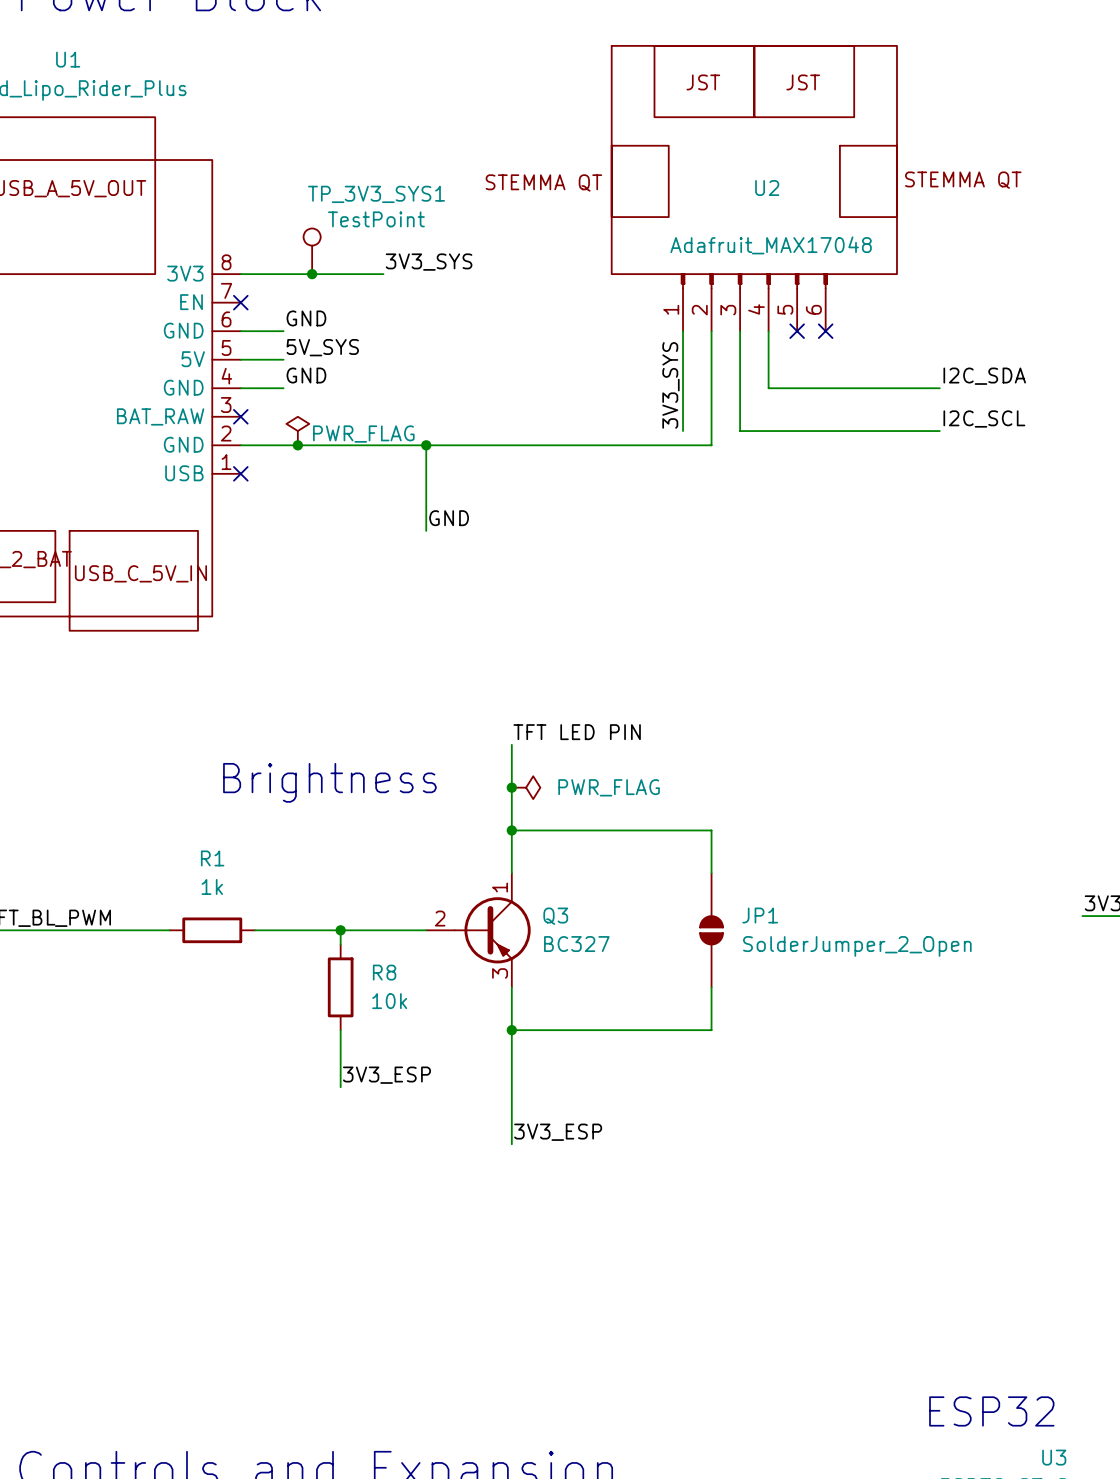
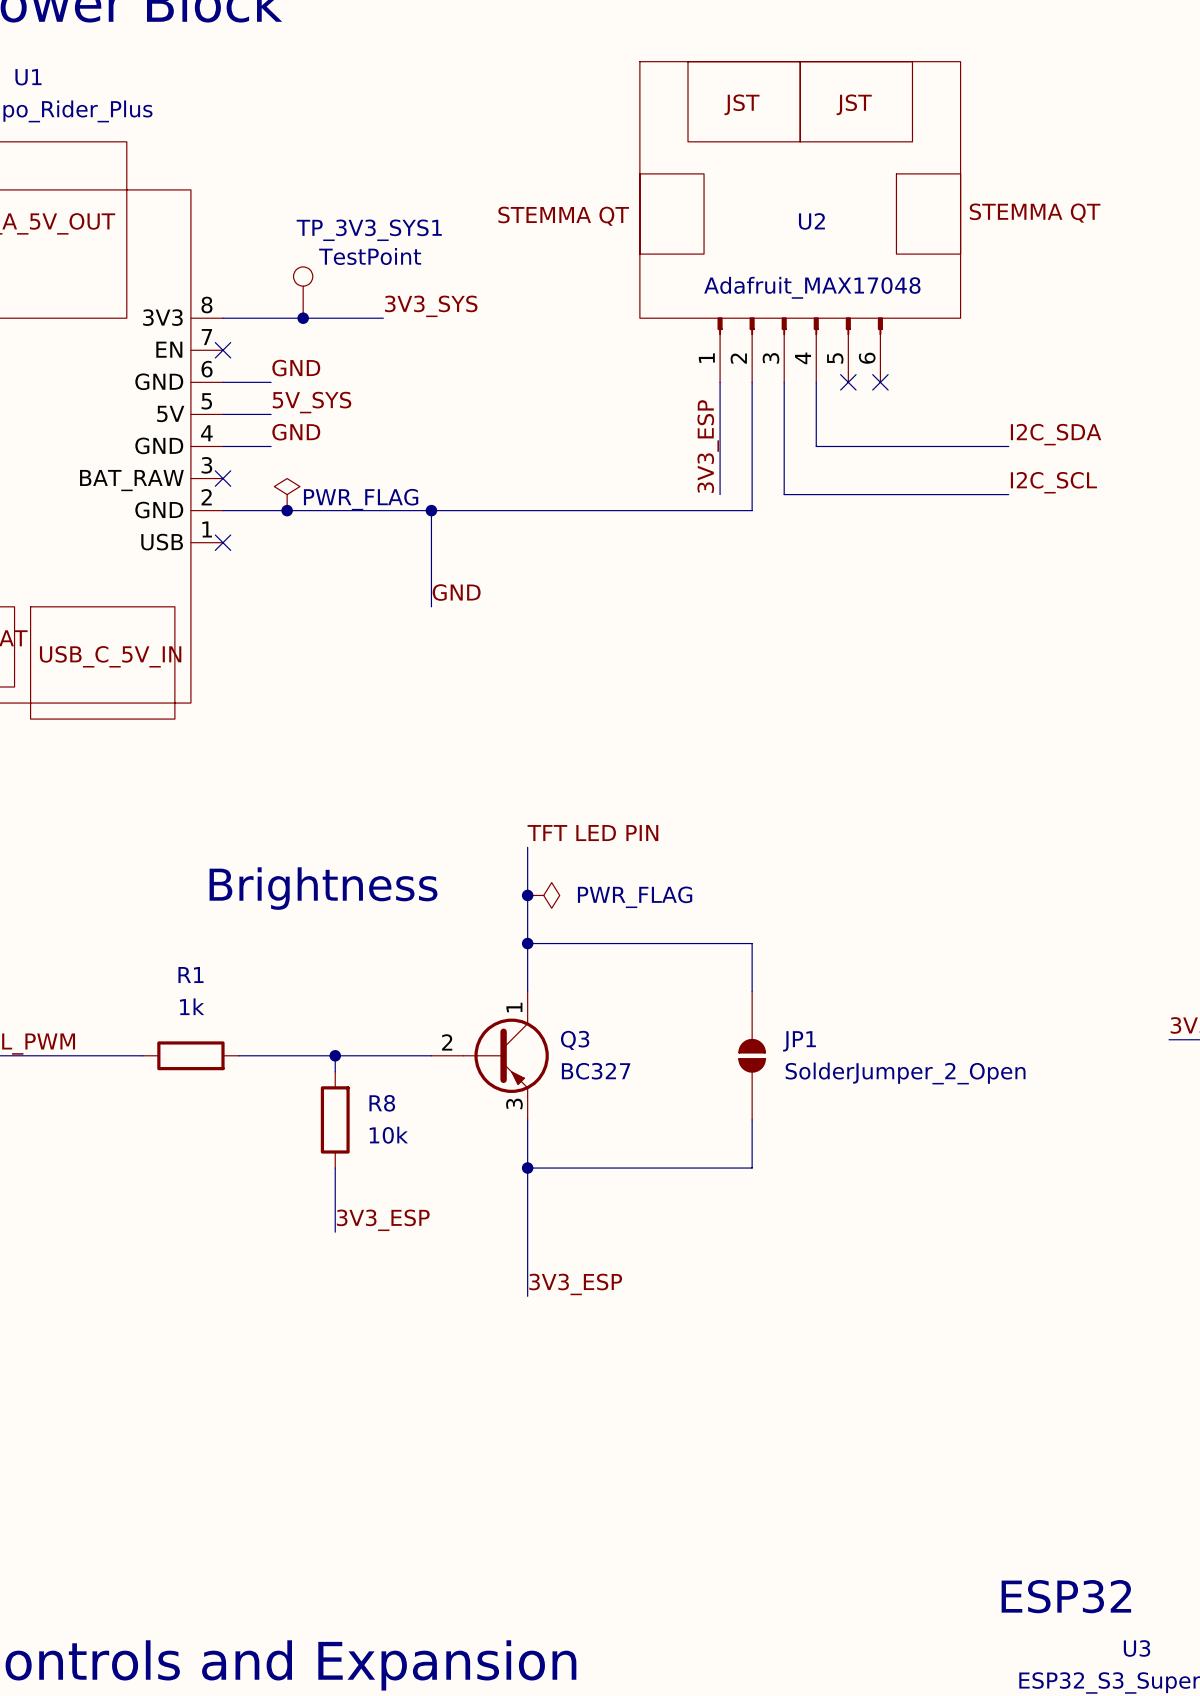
label: 3V3_SYS (670, 385) -> 3V3_ESP (708, 446)

